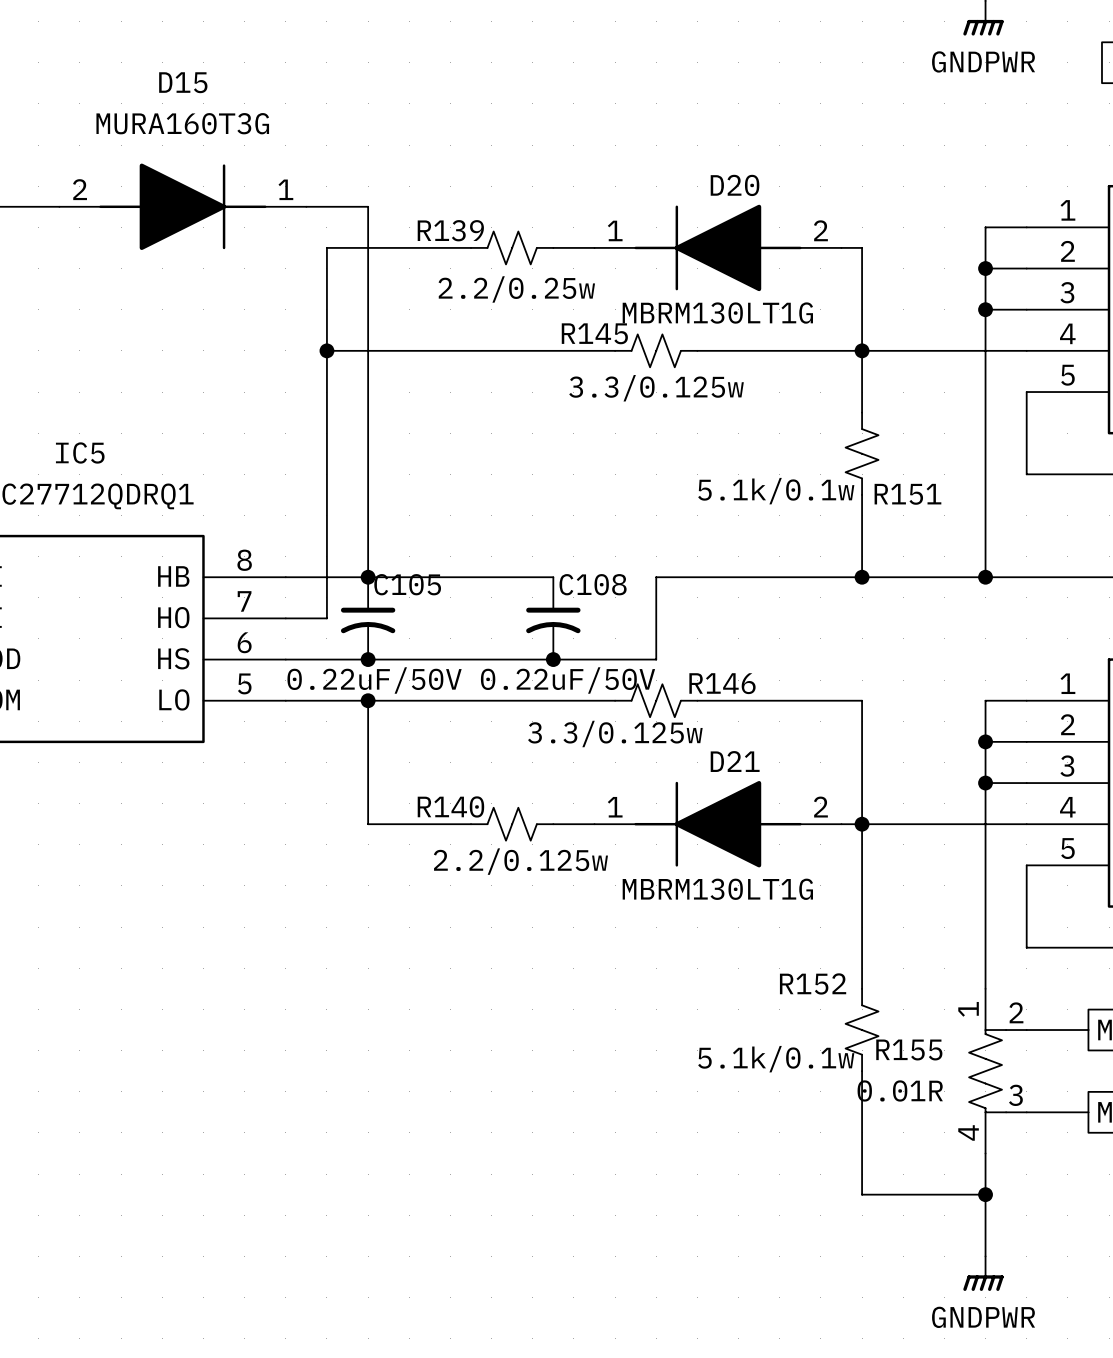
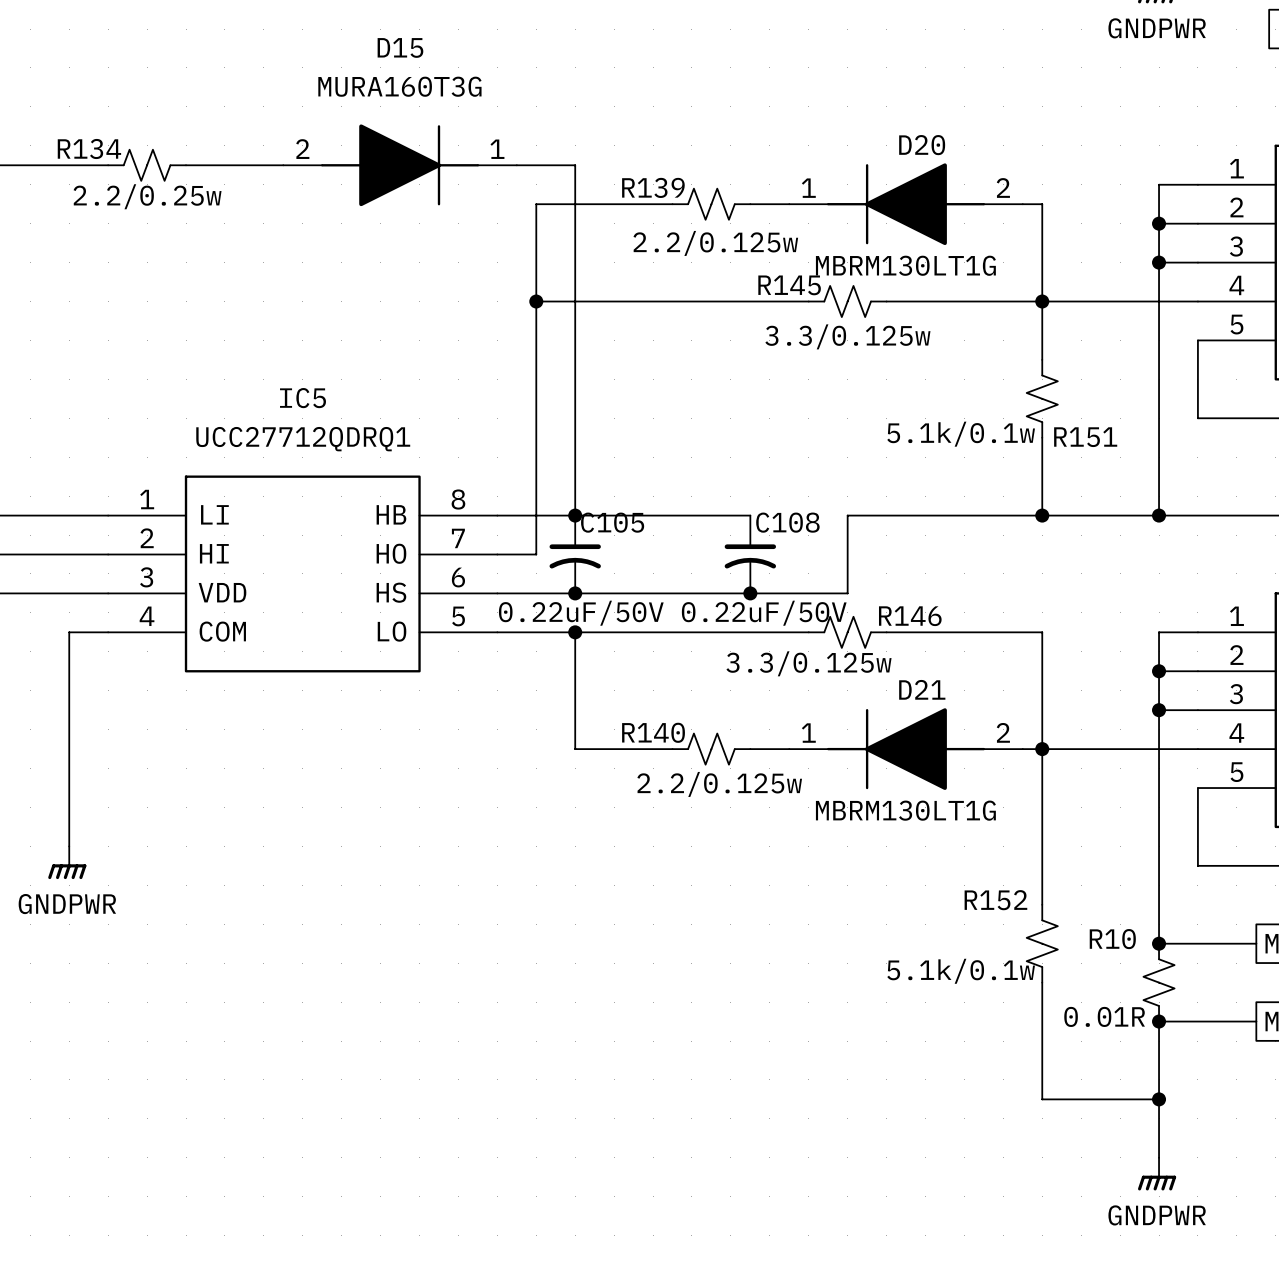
R139 value: 2.2/0.25w (516, 289) -> 2.2/0.125w (715, 243)
junction: none -> (1159, 943)
R10: none -> 0.01R (1159, 982)
R155: 0.01R (997, 1071) -> none
junction: none -> (1159, 1021)

